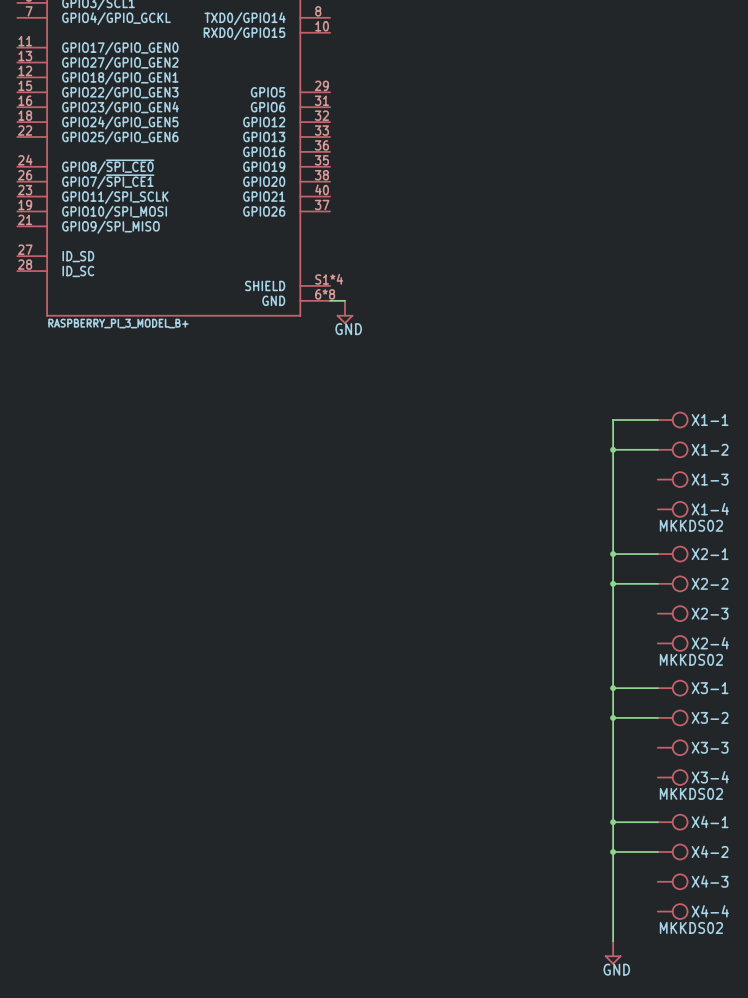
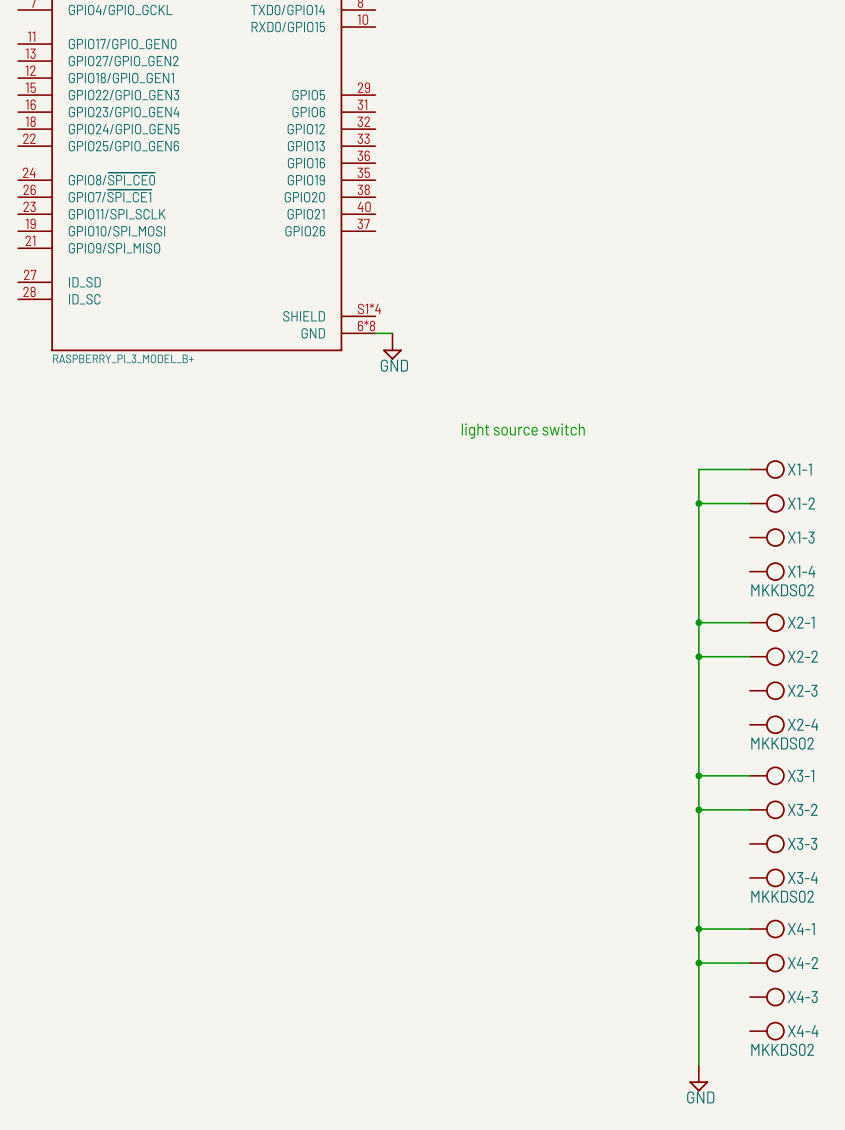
text: none -> light source switch (523, 431)

